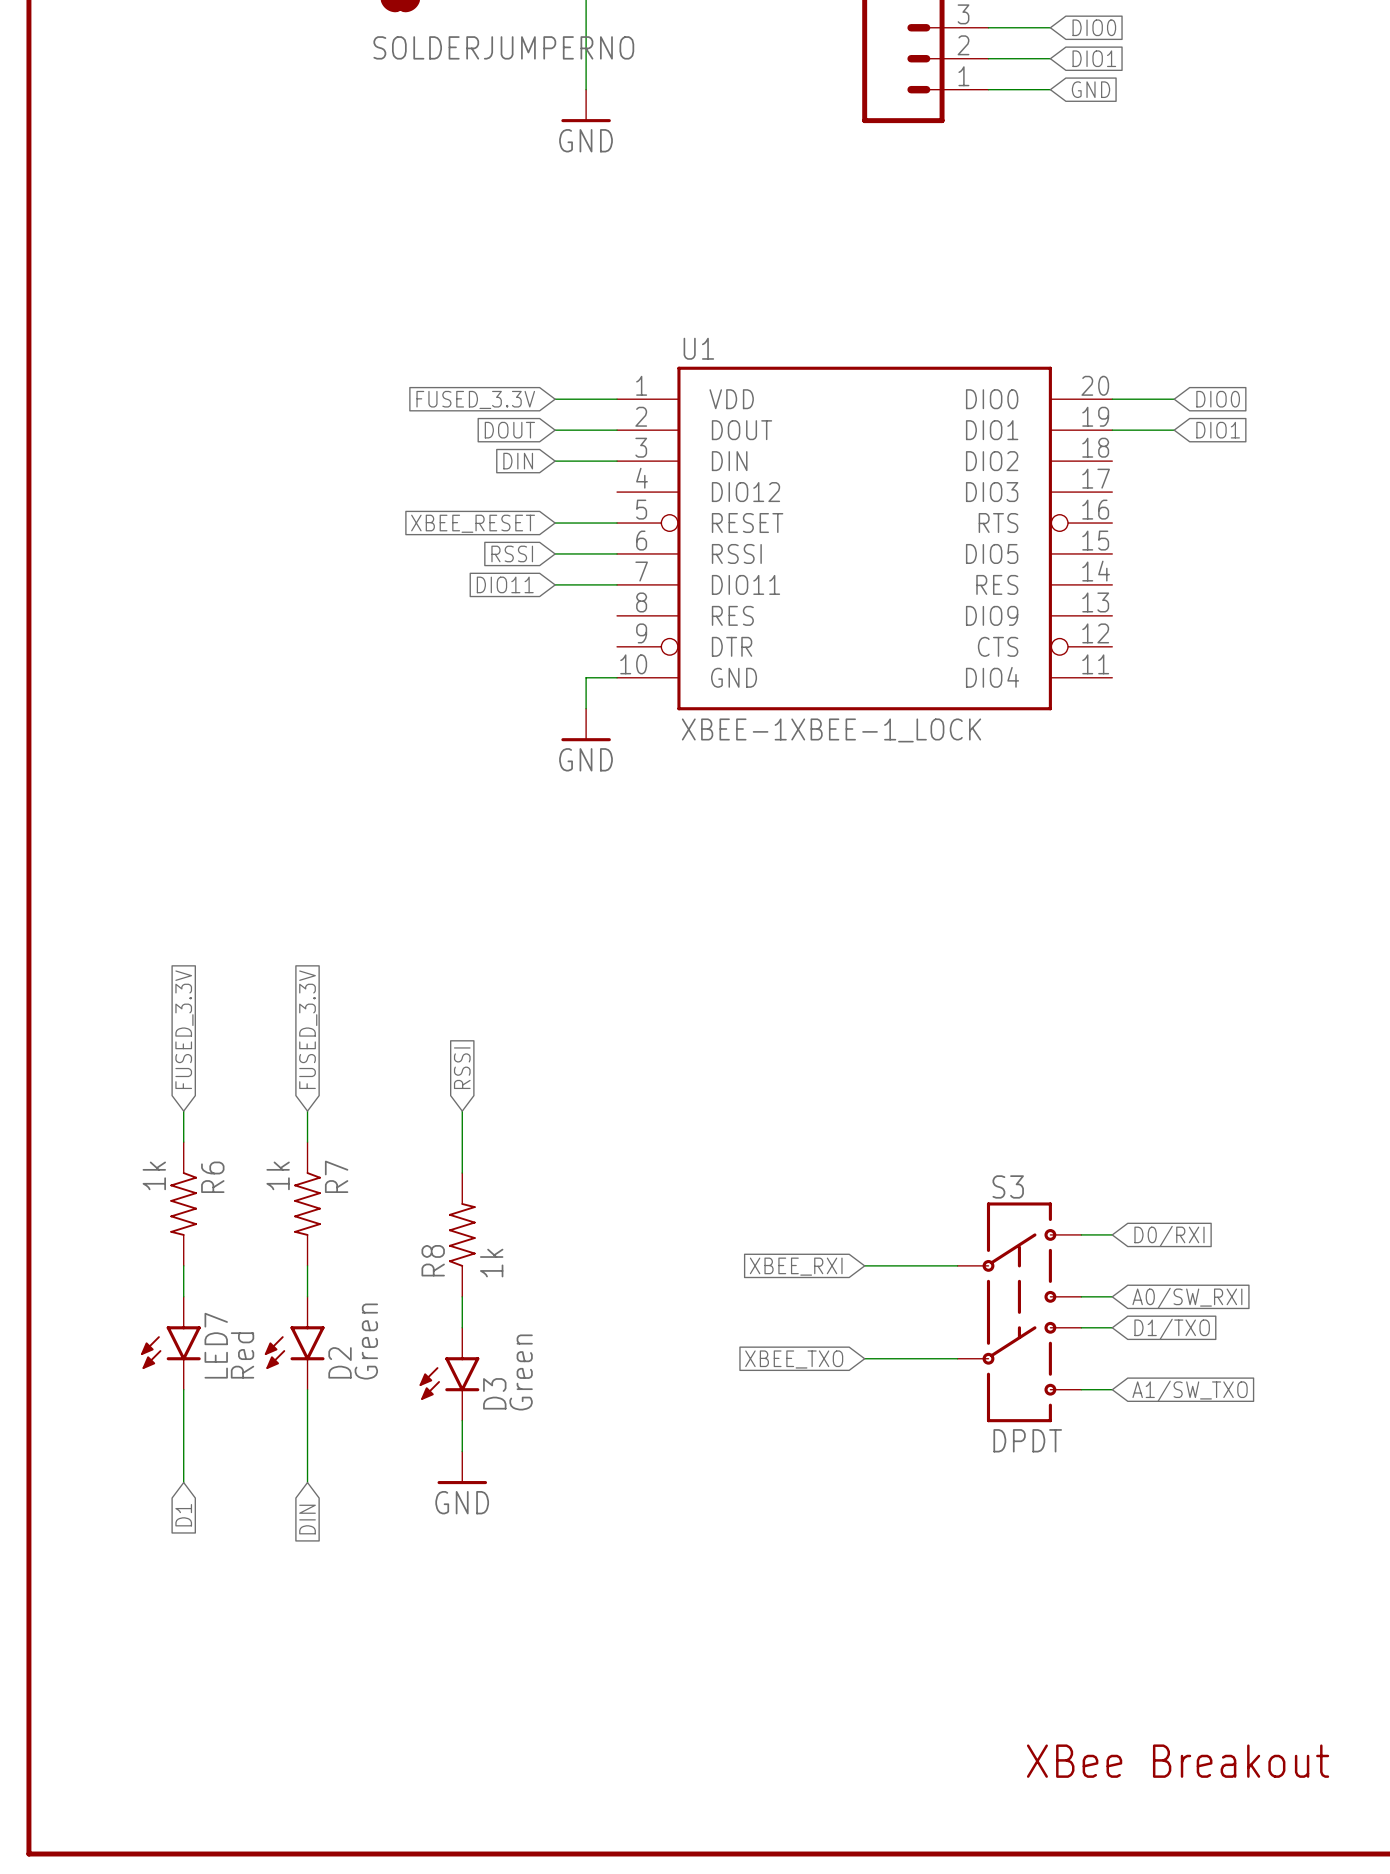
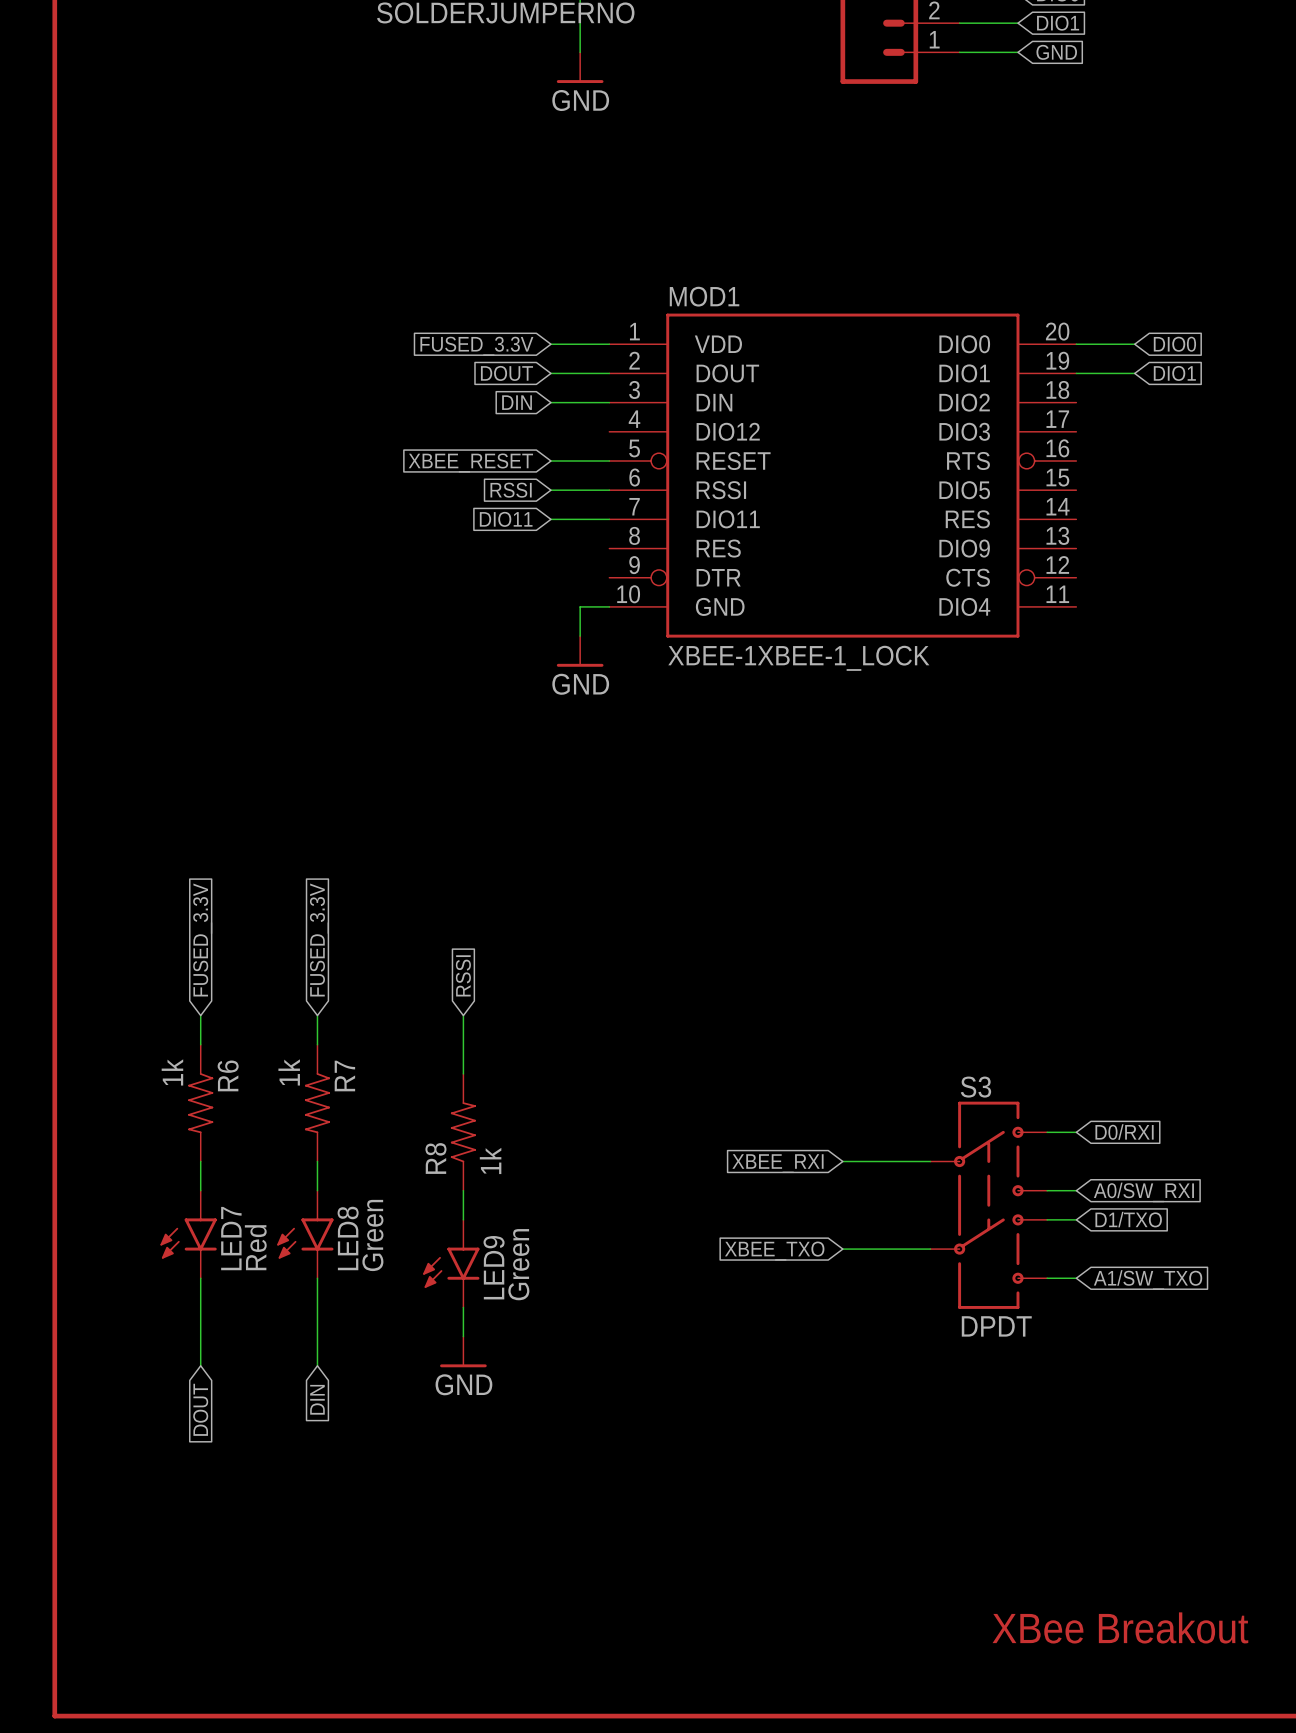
U1 name: U1 (698, 348) -> MOD1 (704, 296)
D2 name: D2 (340, 1362) -> LED8 (348, 1238)
D3 name: D3 (494, 1393) -> LED9 (494, 1267)
global label: D1 (183, 1515) -> DOUT (200, 1409)

